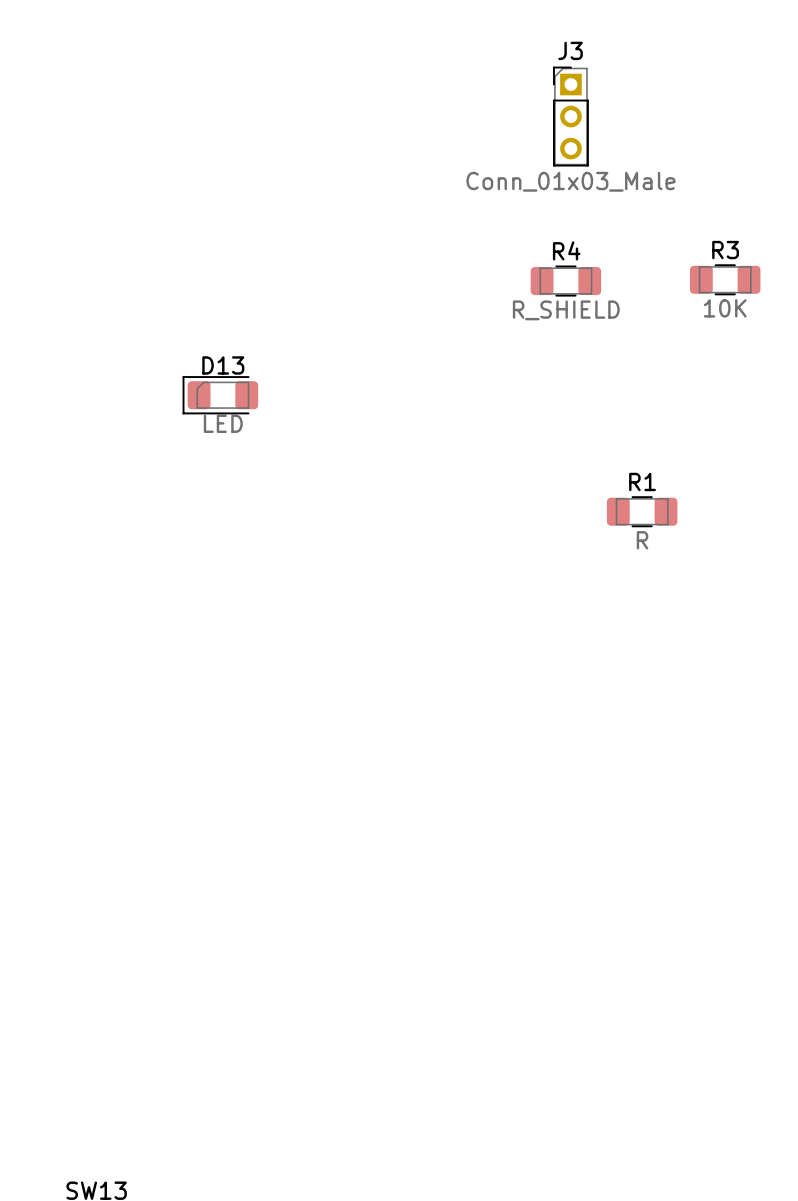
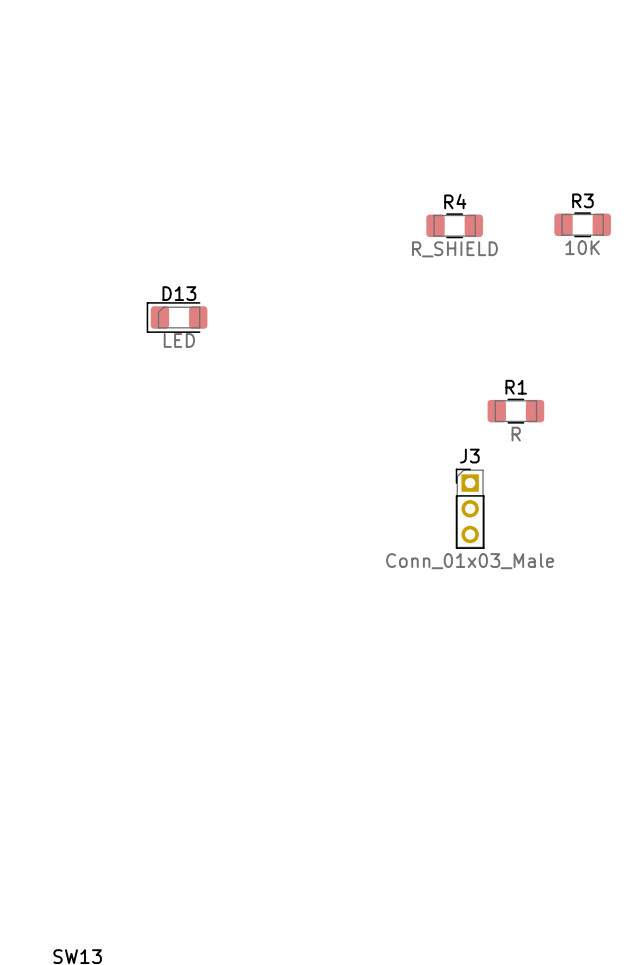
J3 position: (570, 116) -> (470, 508)

